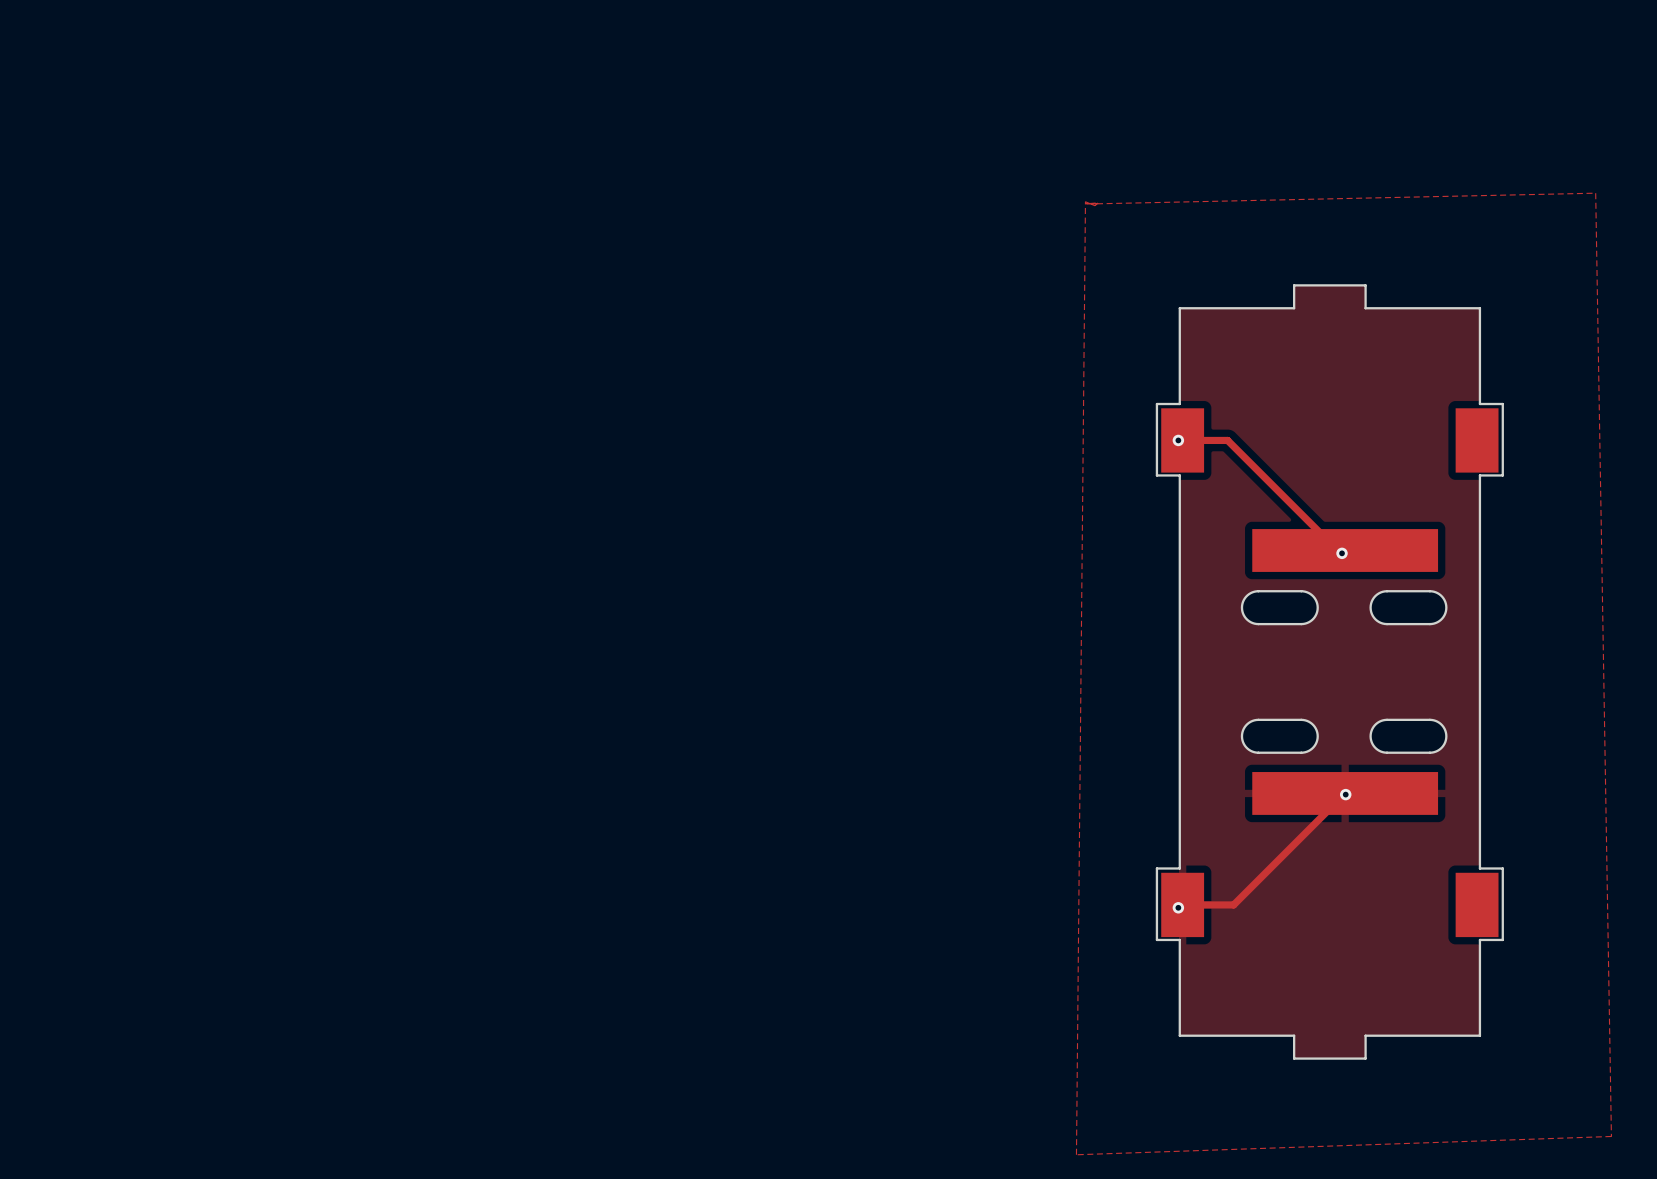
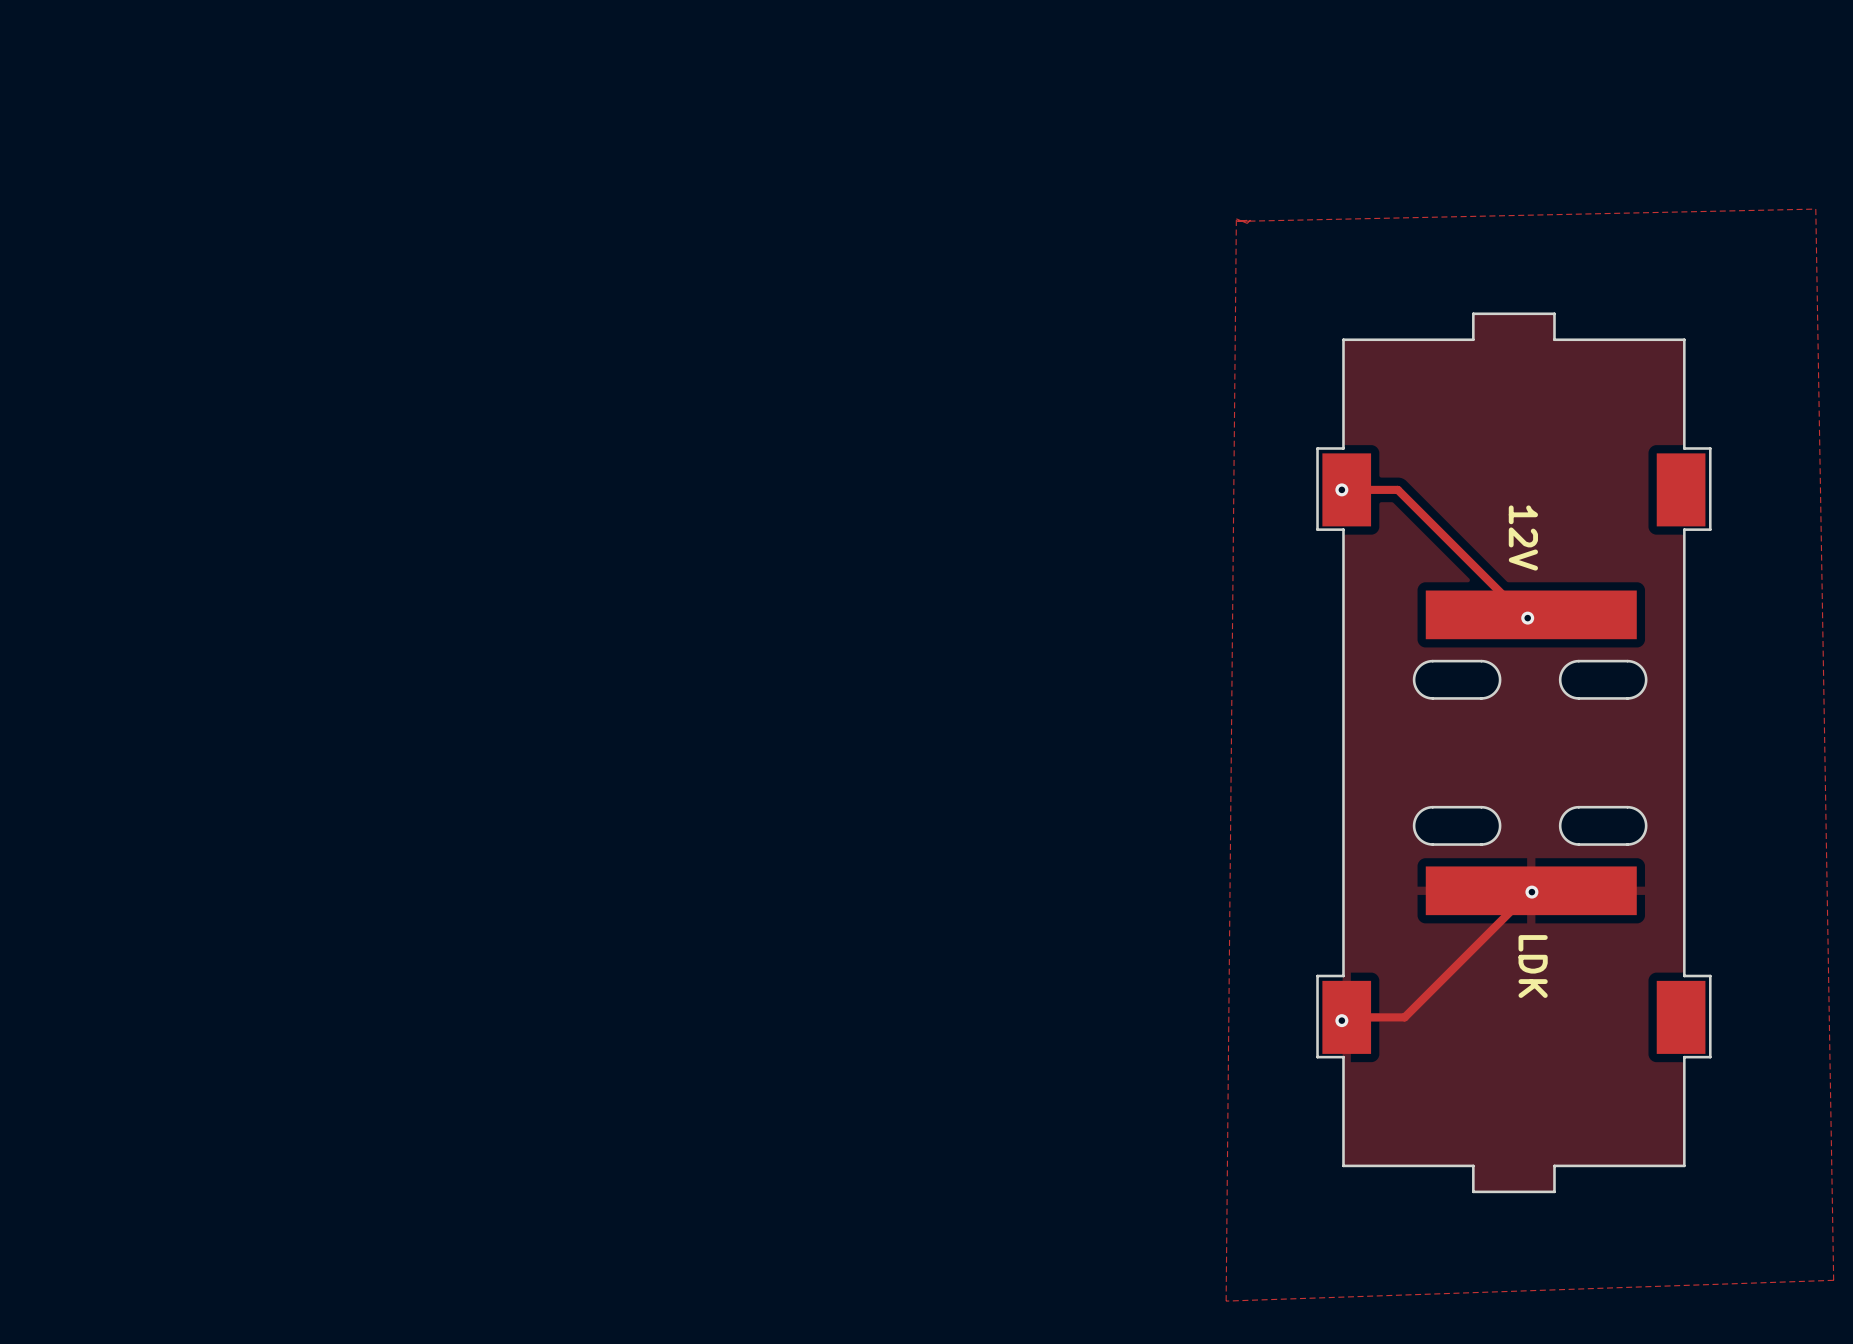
text: none -> 12V (1523, 538)
text: none -> LDK (1533, 966)

